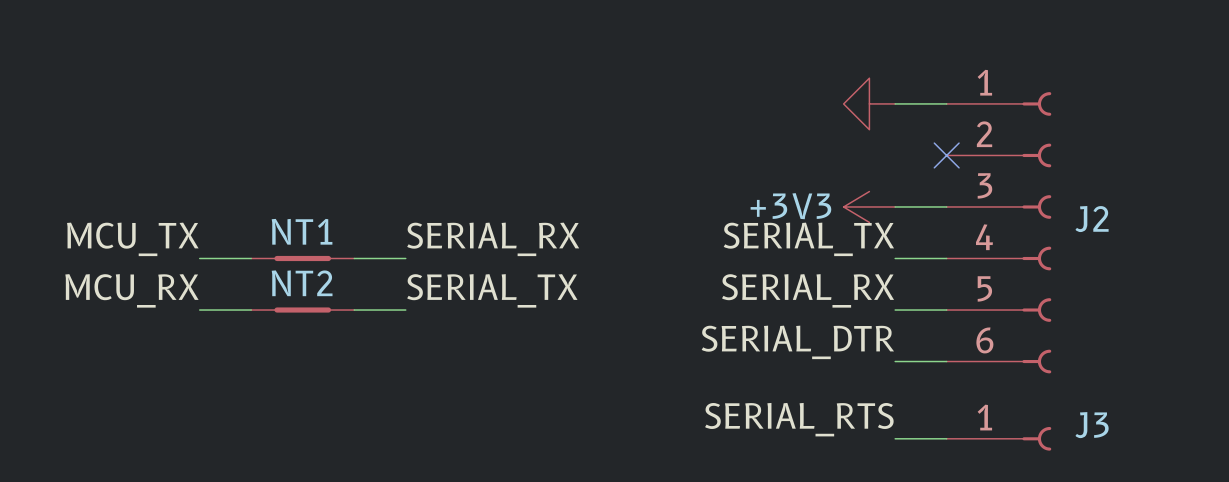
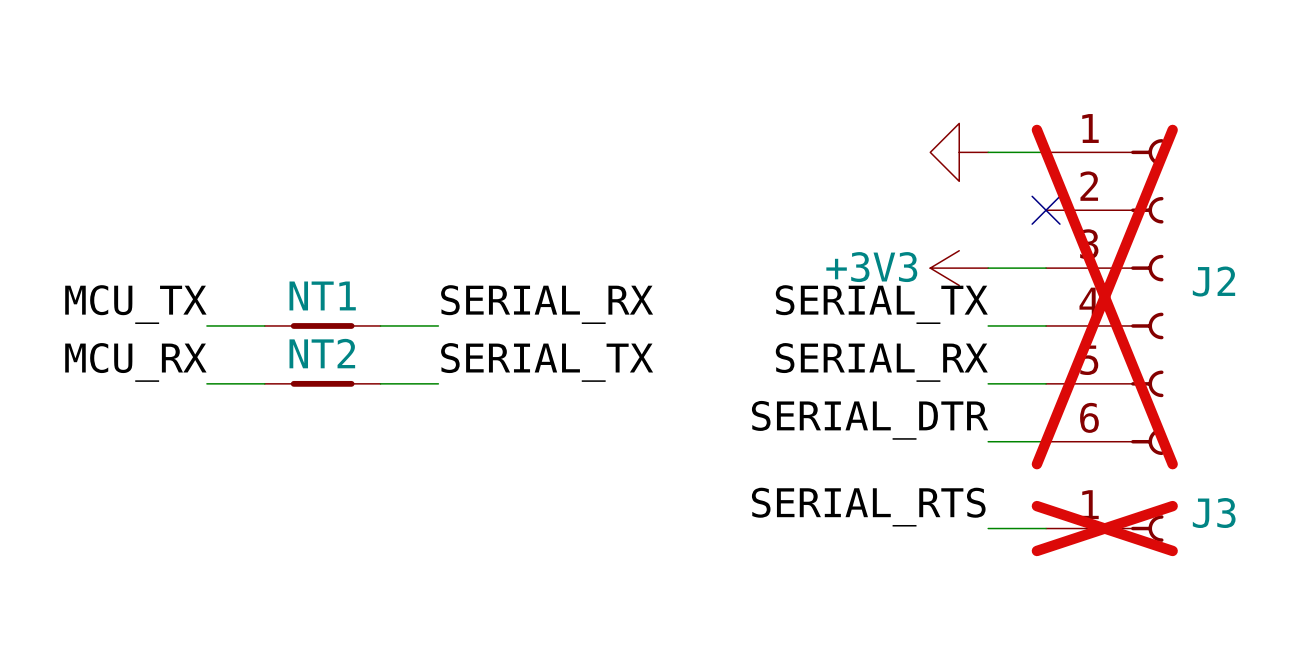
J2 do-not-place cross: none -> (1104, 297)
J3 do-not-place cross: none -> (1104, 528)

